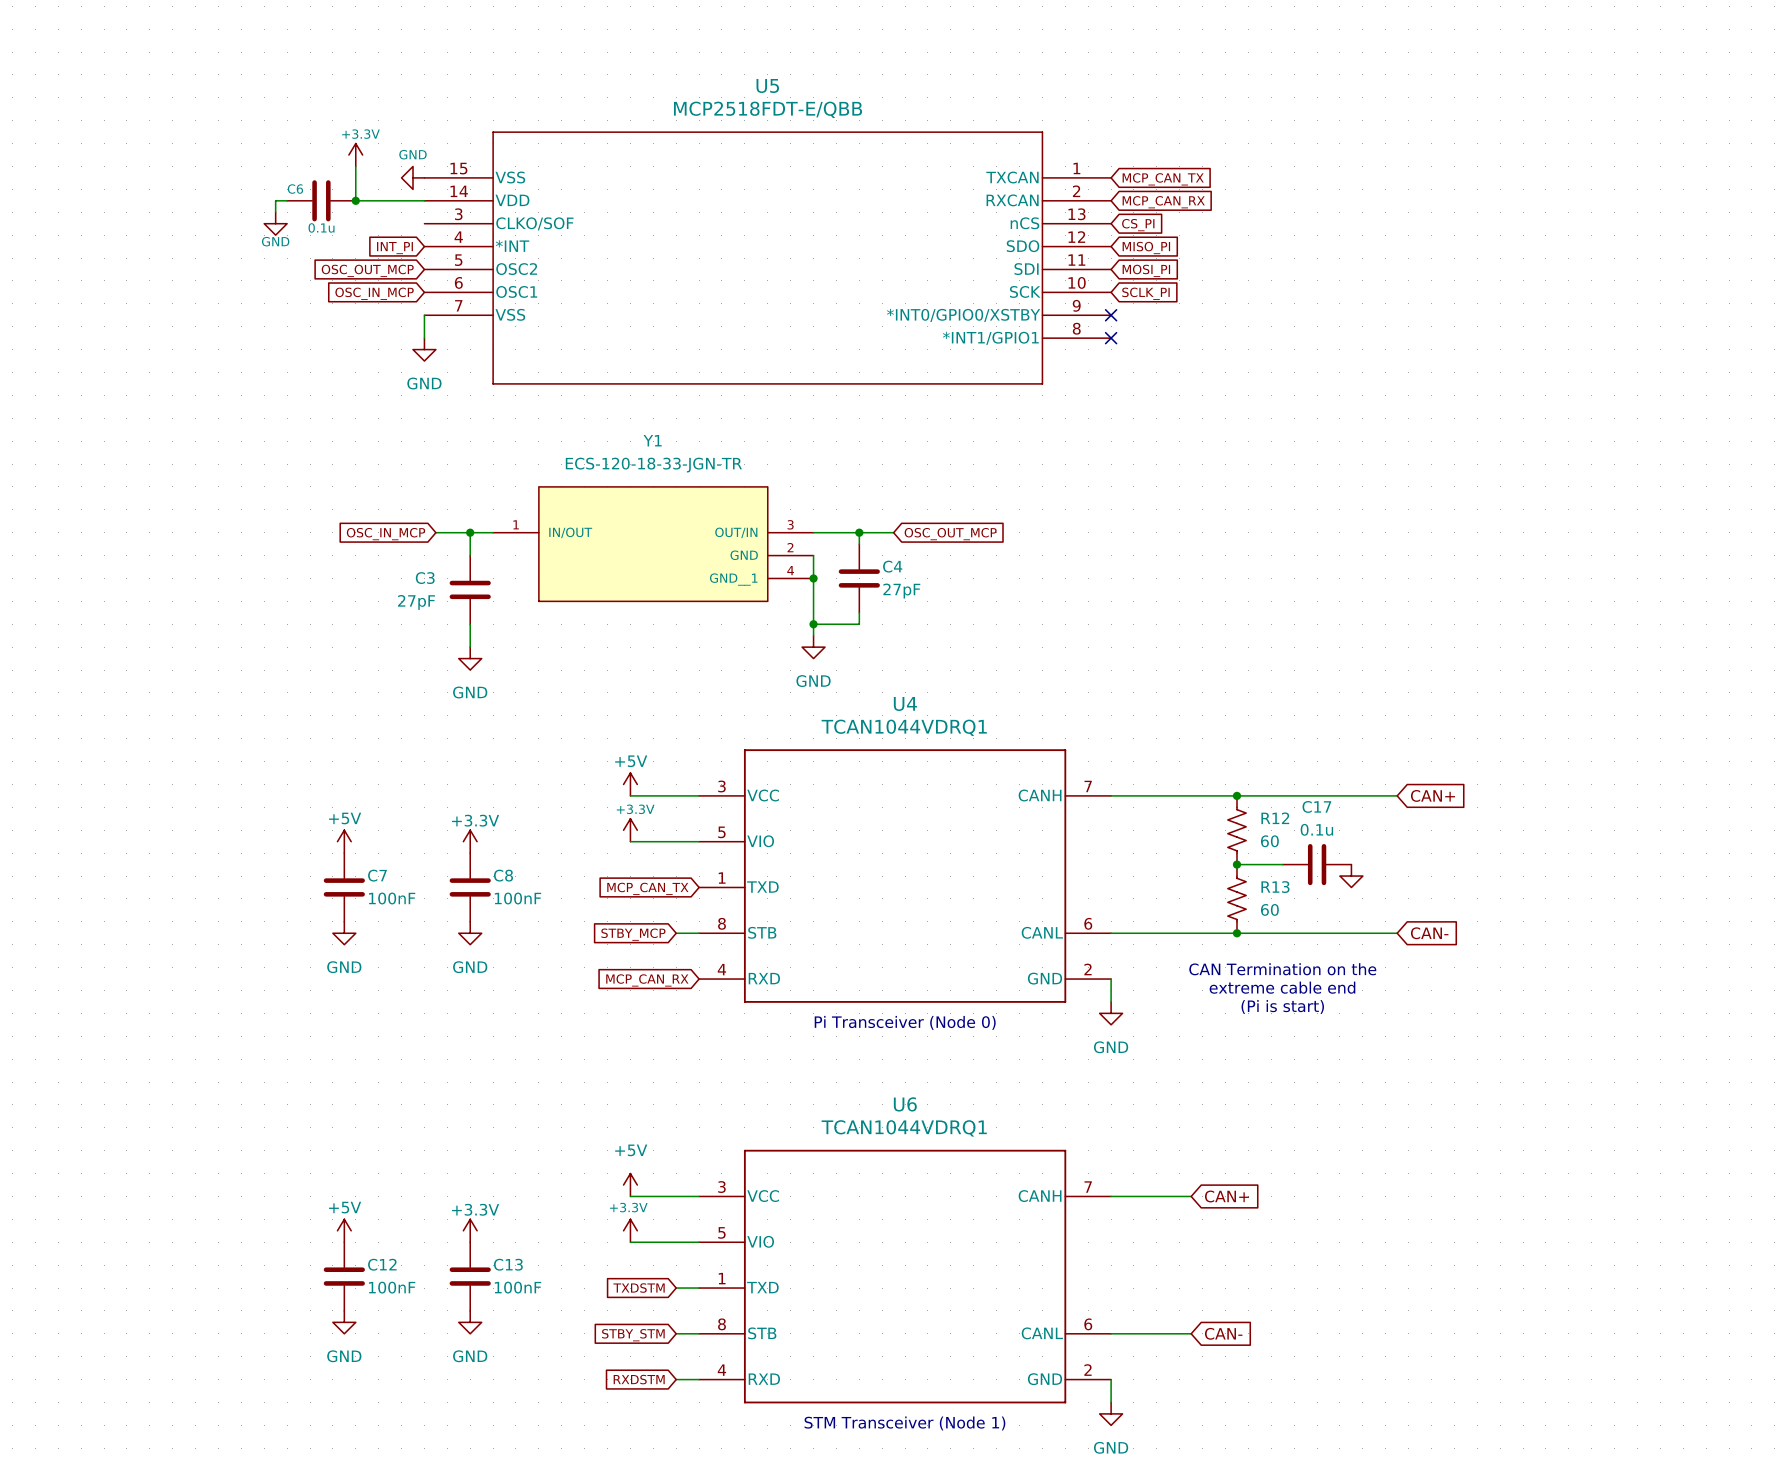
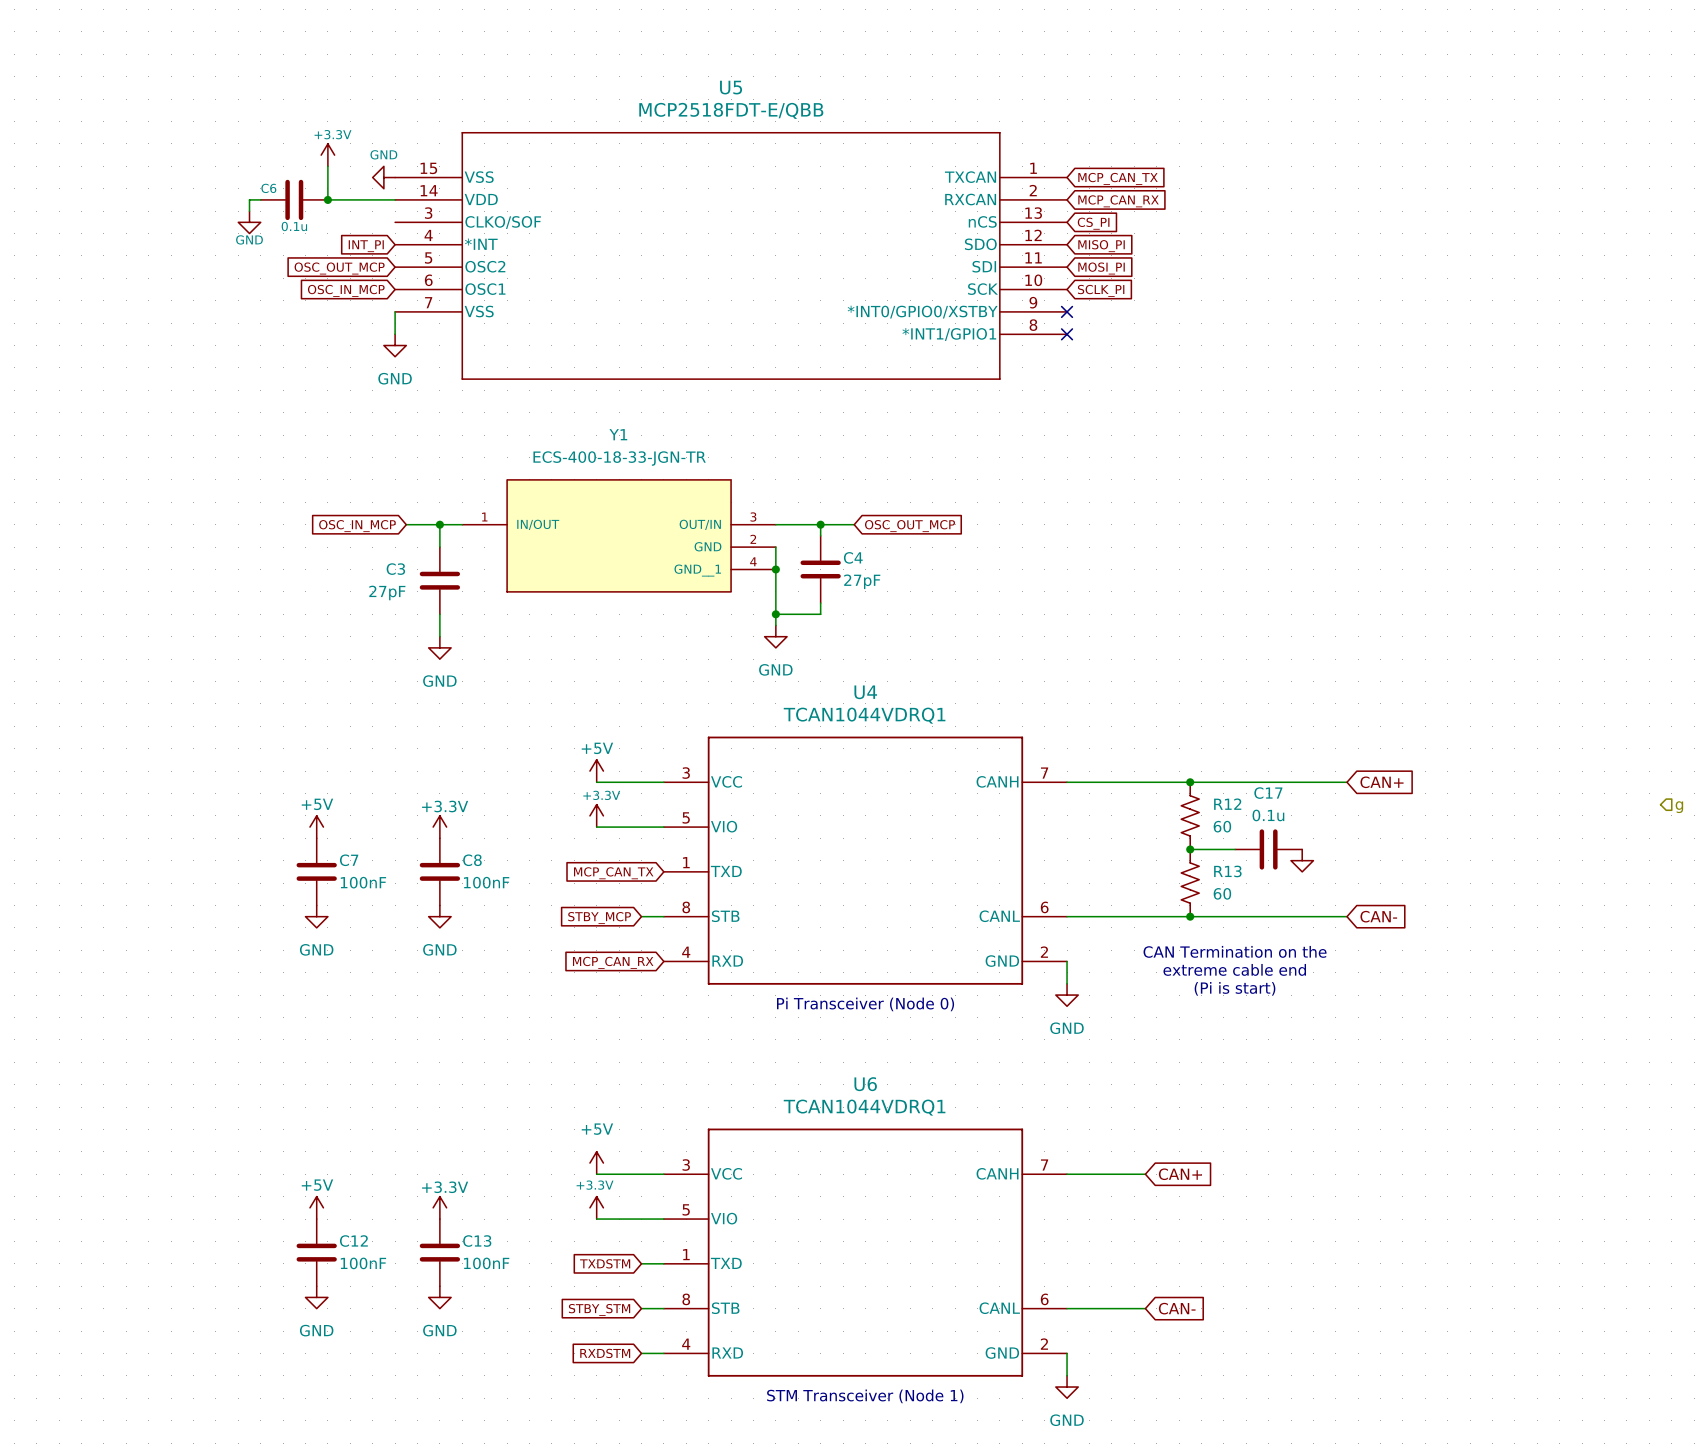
Y1 value: ECS-120-18-33-JGN-TR (653, 465) -> ECS-400-18-33-JGN-TR (619, 458)
hierarchical label: none -> g (1679, 807)

